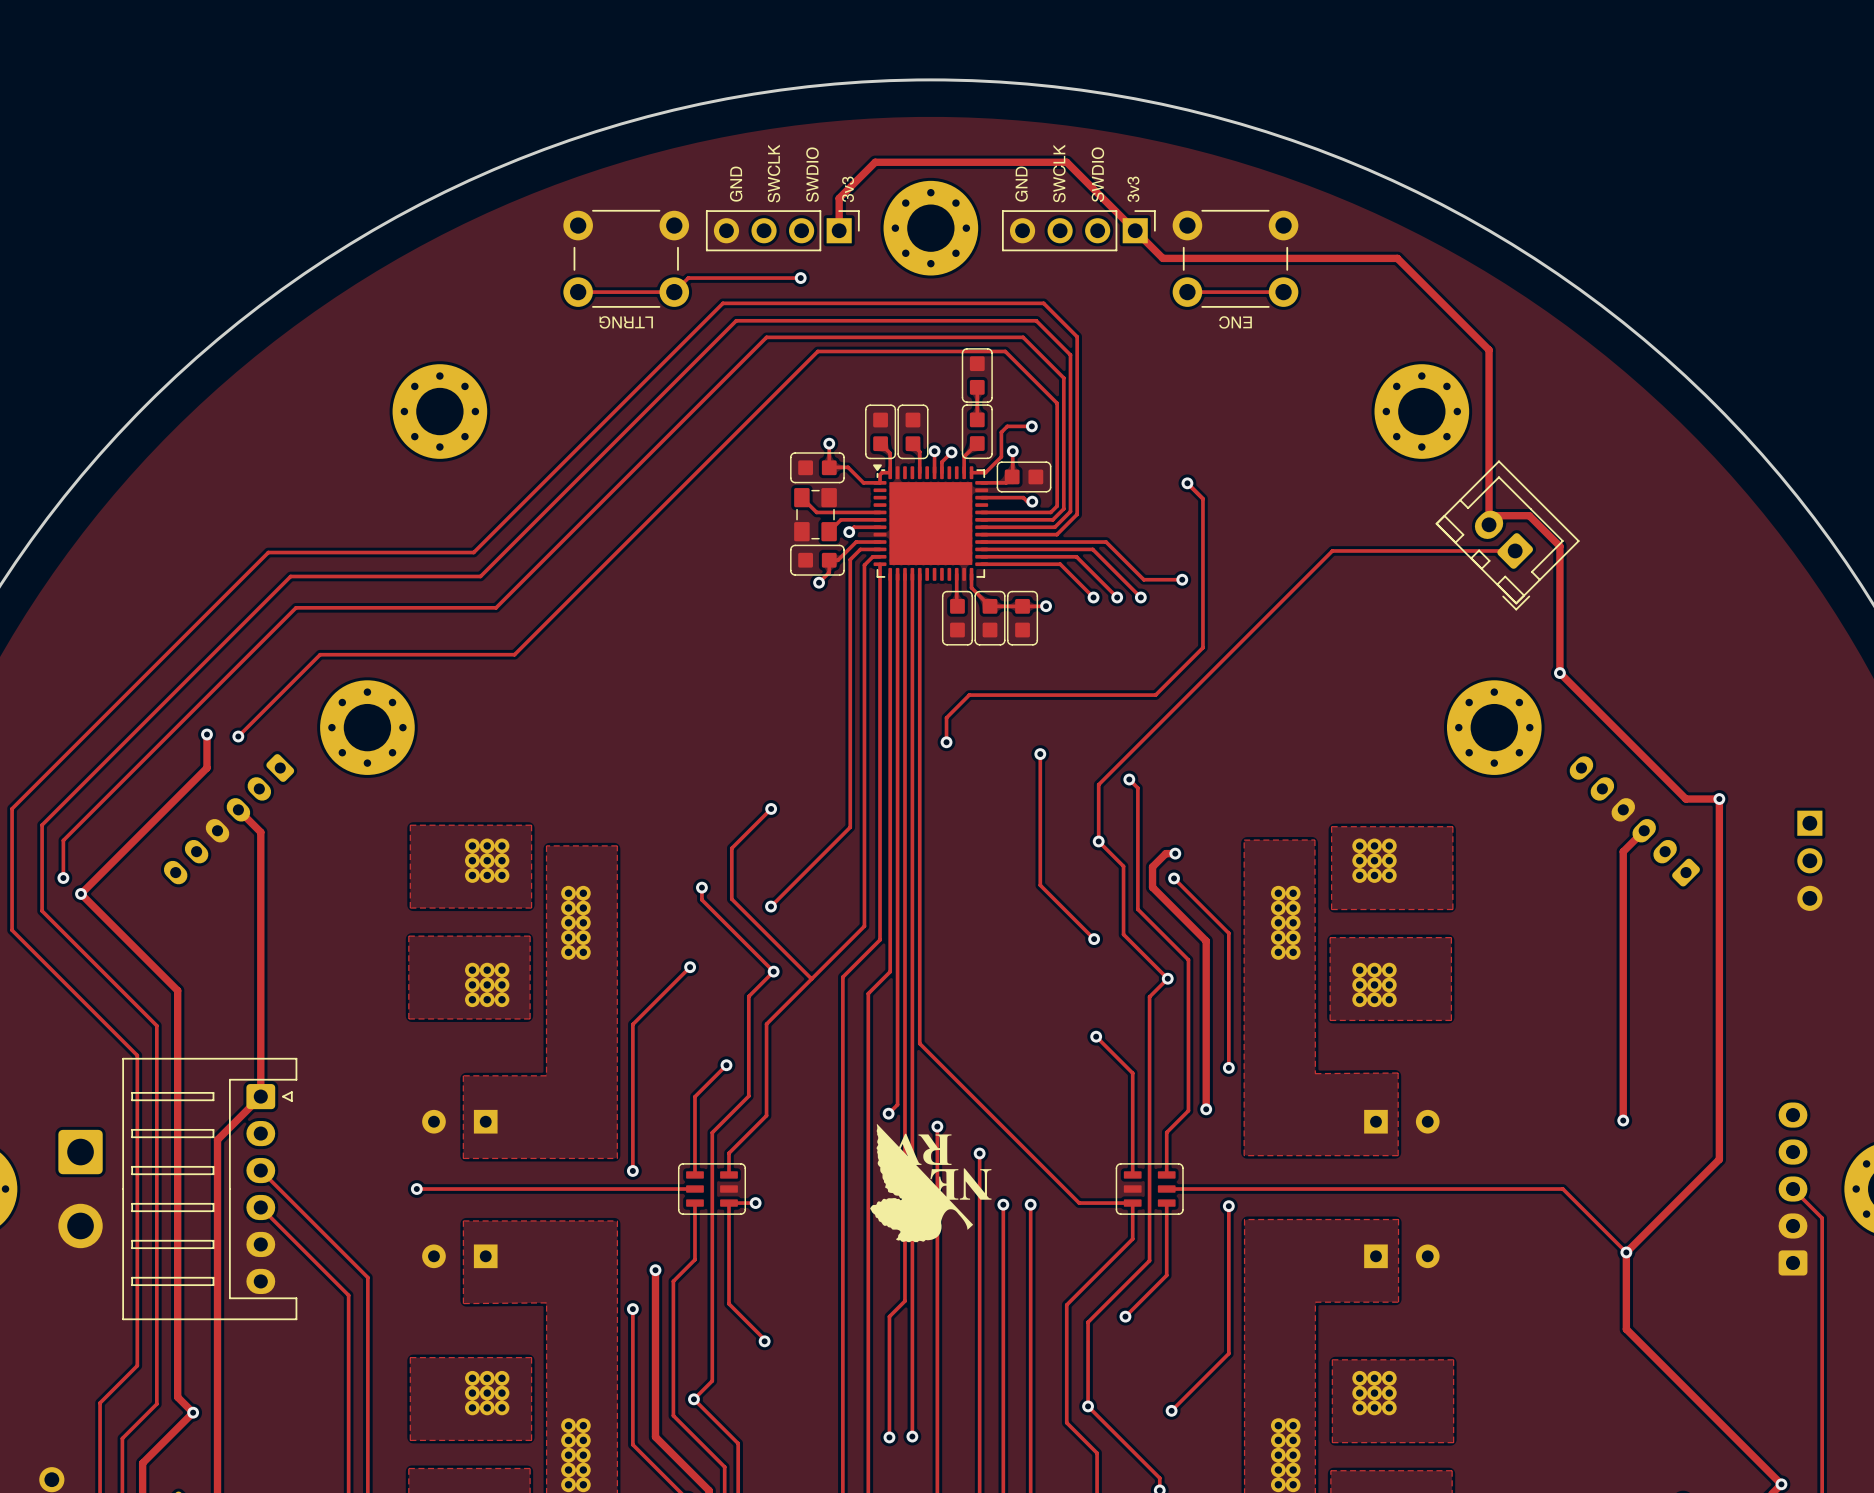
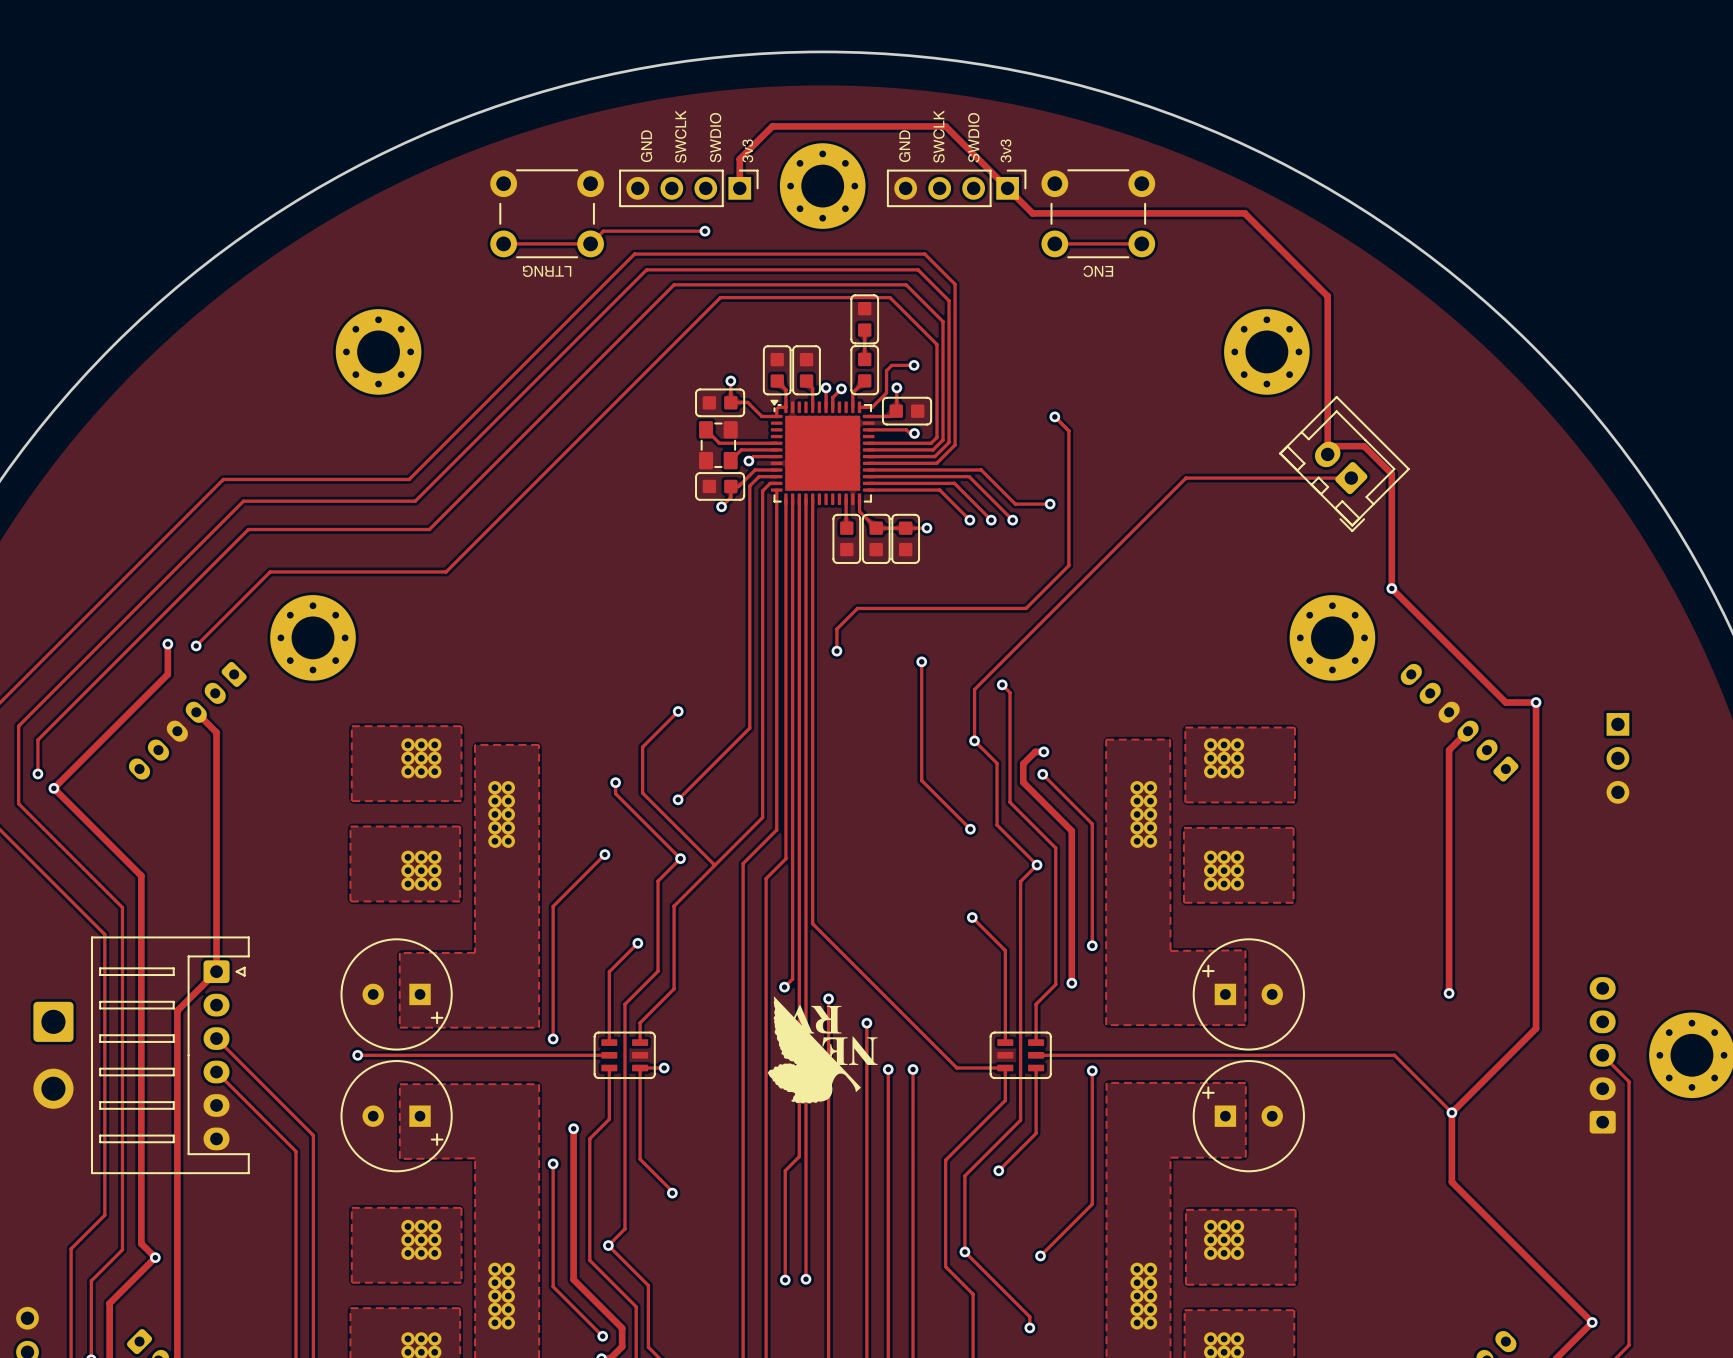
part side: bottom (459, 1121) -> top (396, 994)
part side: bottom (1401, 1121) -> top (1248, 994)
part side: bottom (459, 1256) -> top (396, 1116)
part side: bottom (1401, 1256) -> top (1248, 1116)

